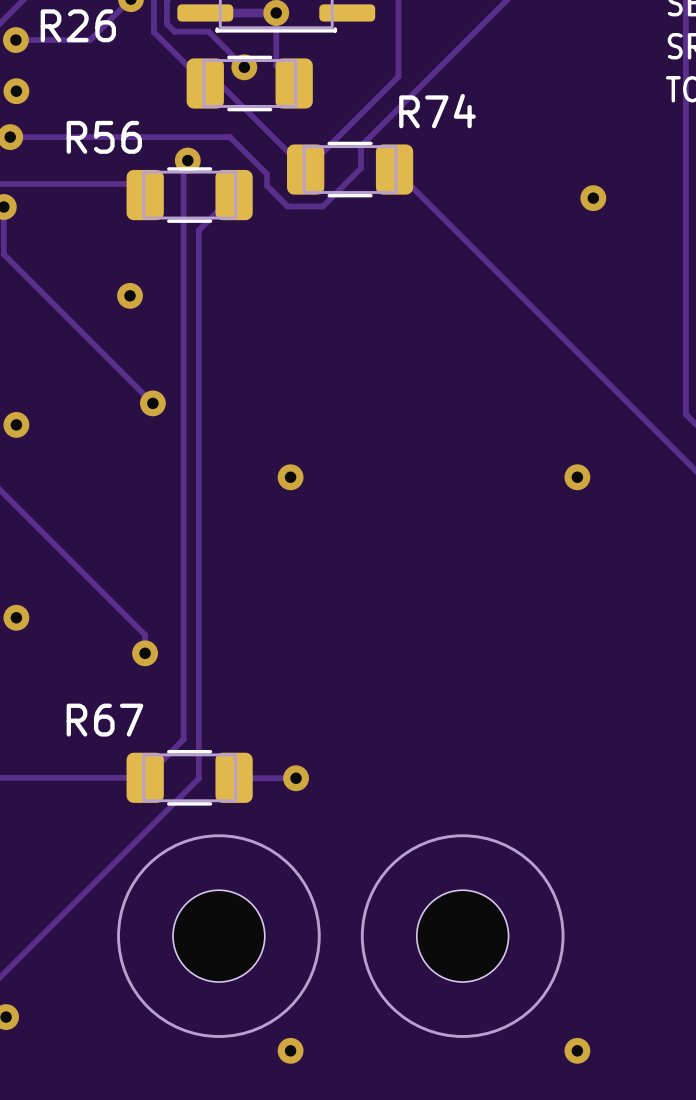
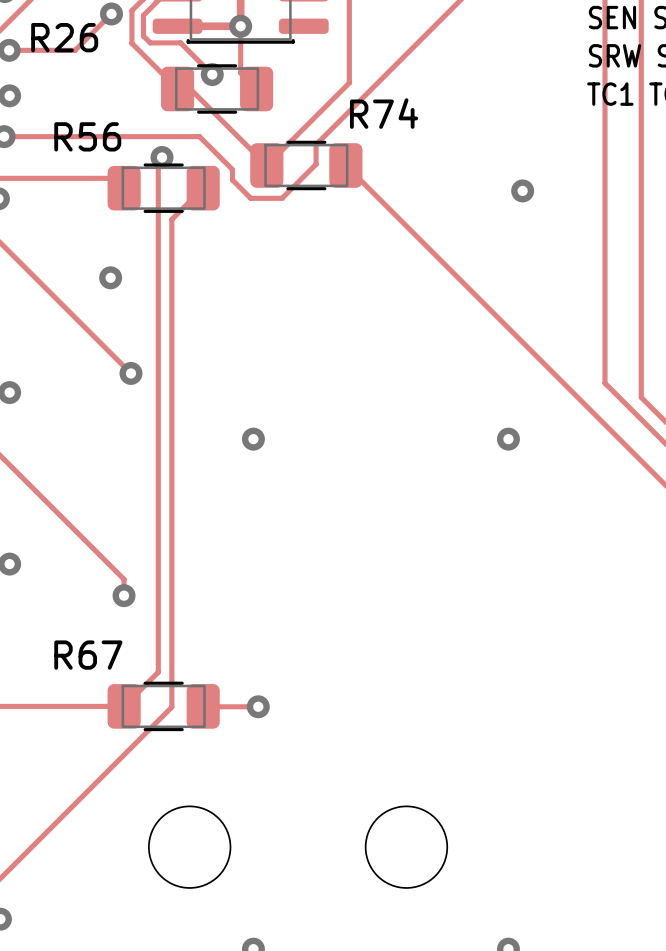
drawing: [117, 834, 321, 1038] -> none
drawing: [360, 834, 565, 1038] -> none

